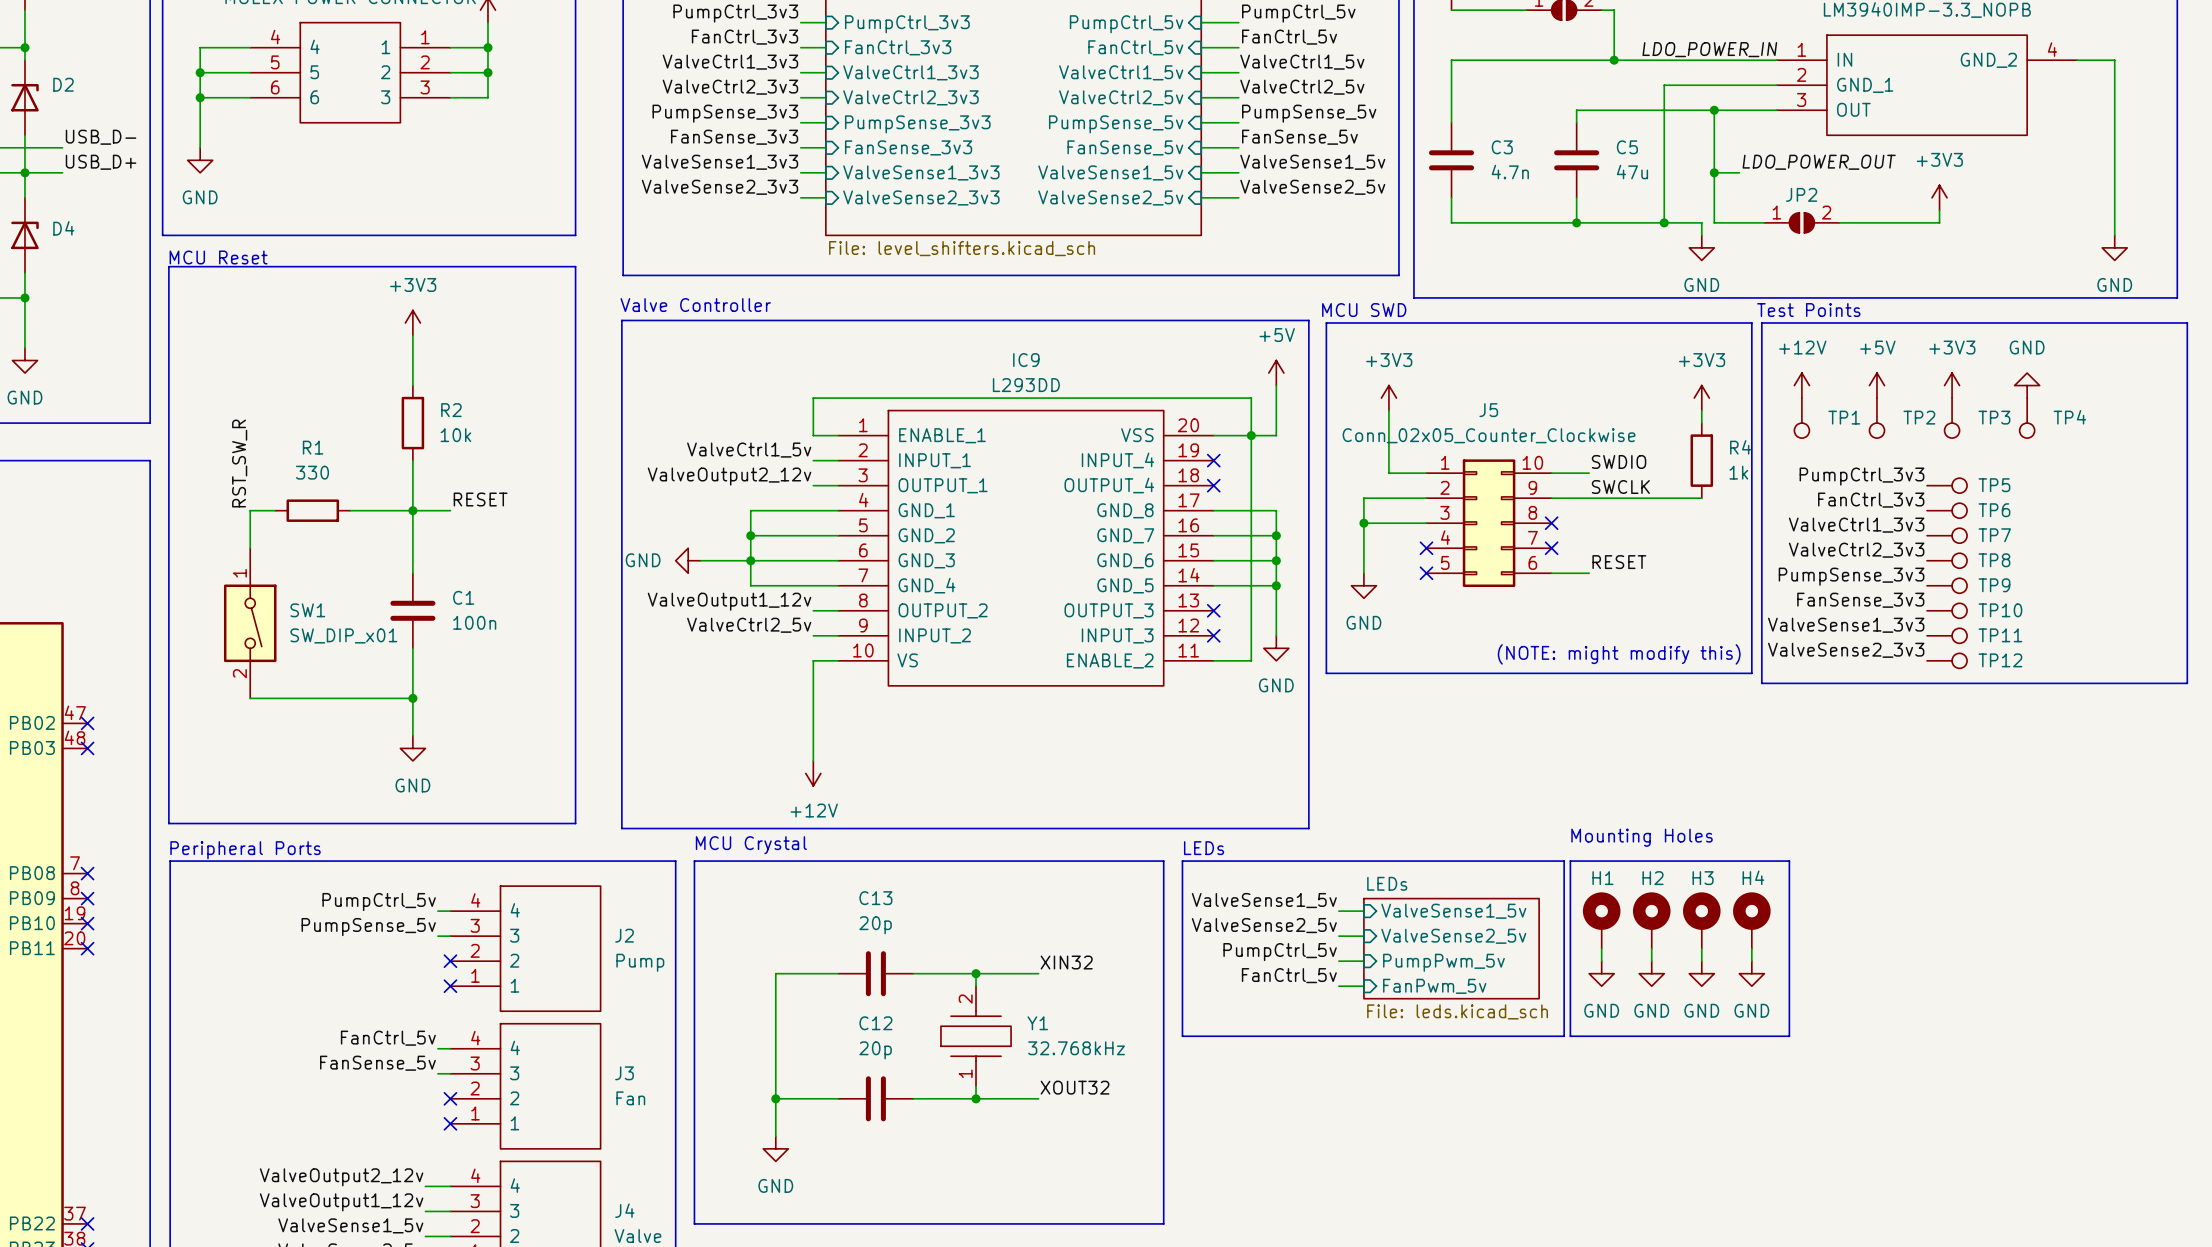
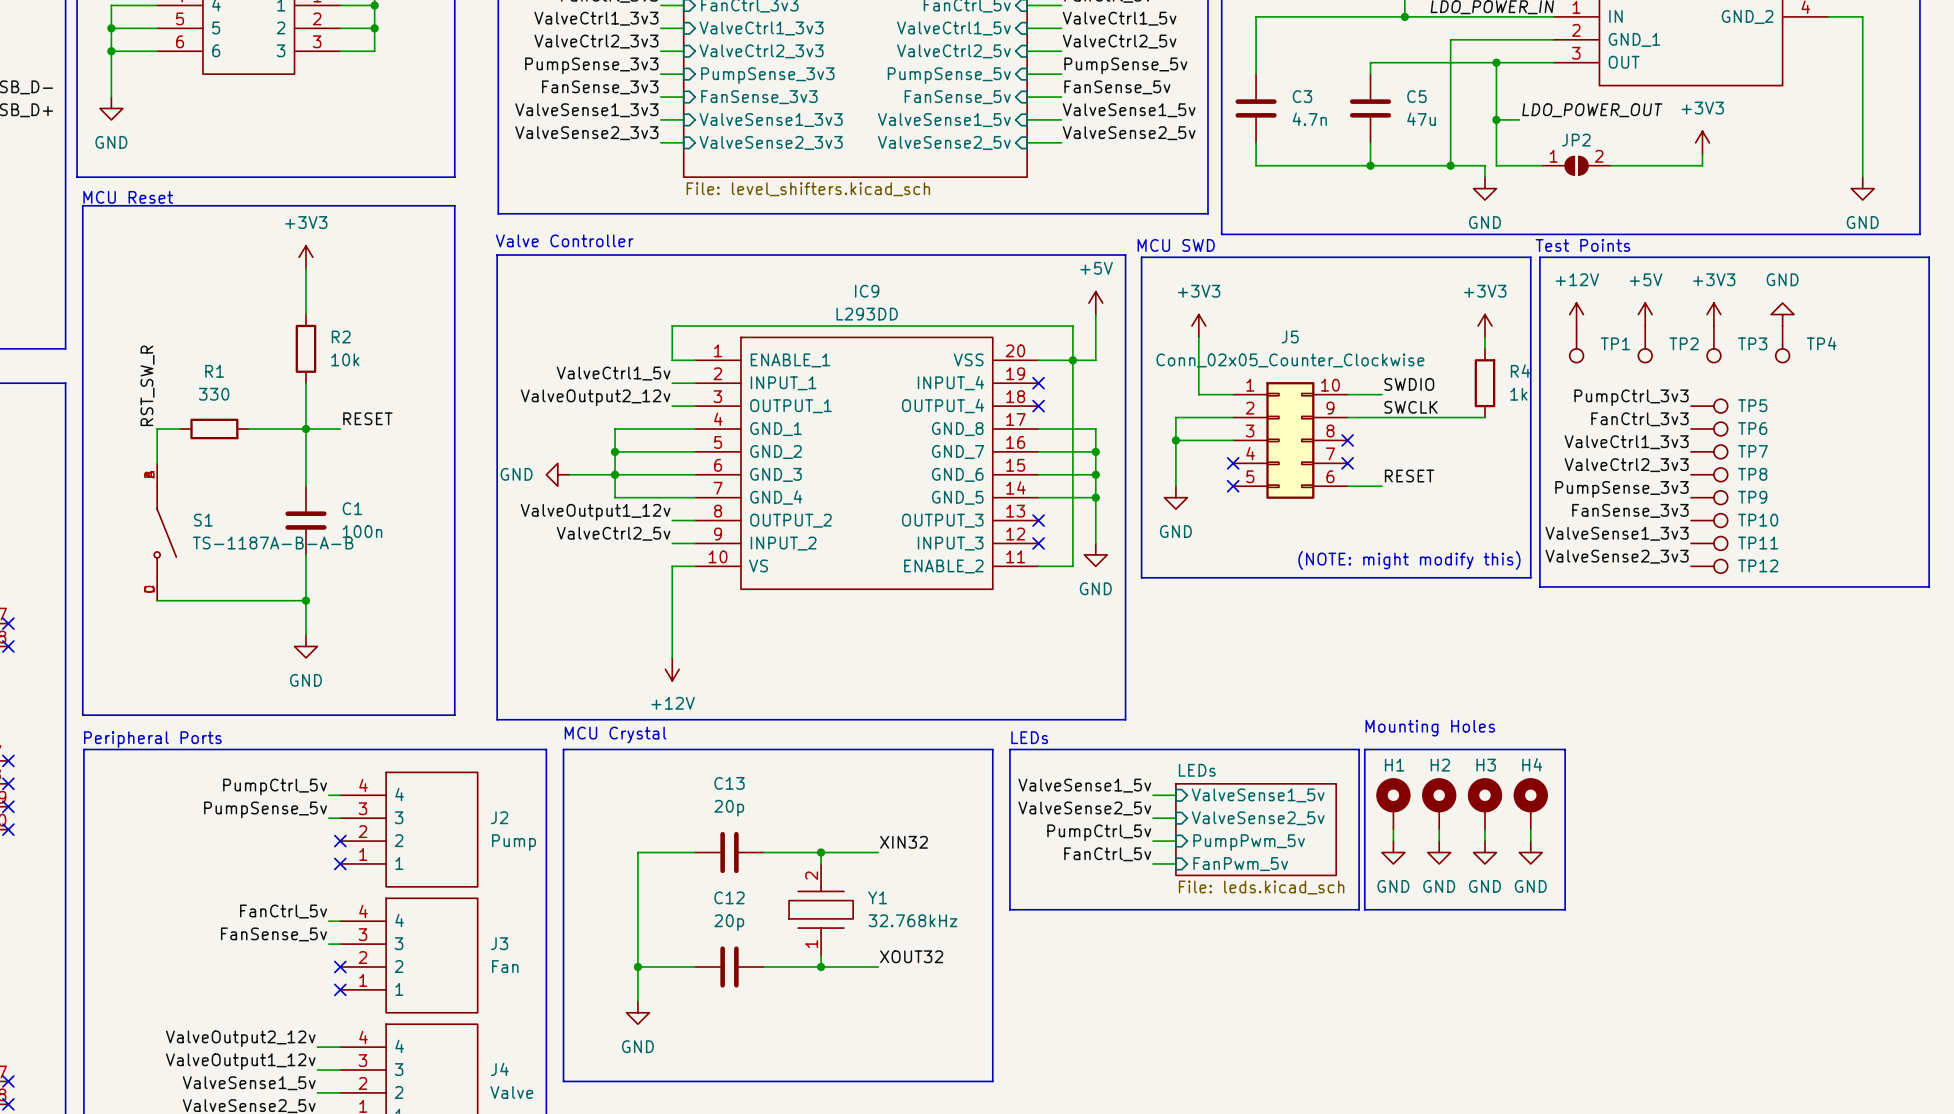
SW1: SW_DIP_x01 (250, 623) -> none
S1: none -> TS-1187A-B-A-B (165, 532)

